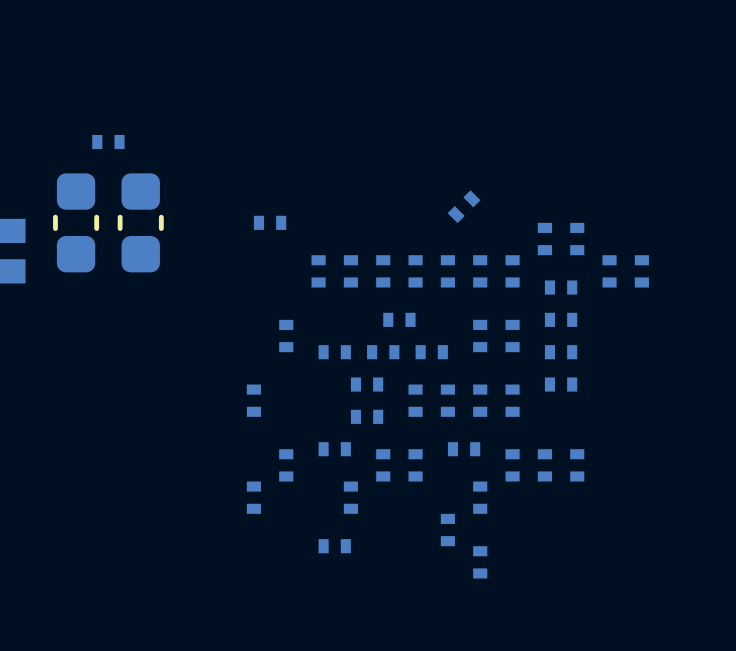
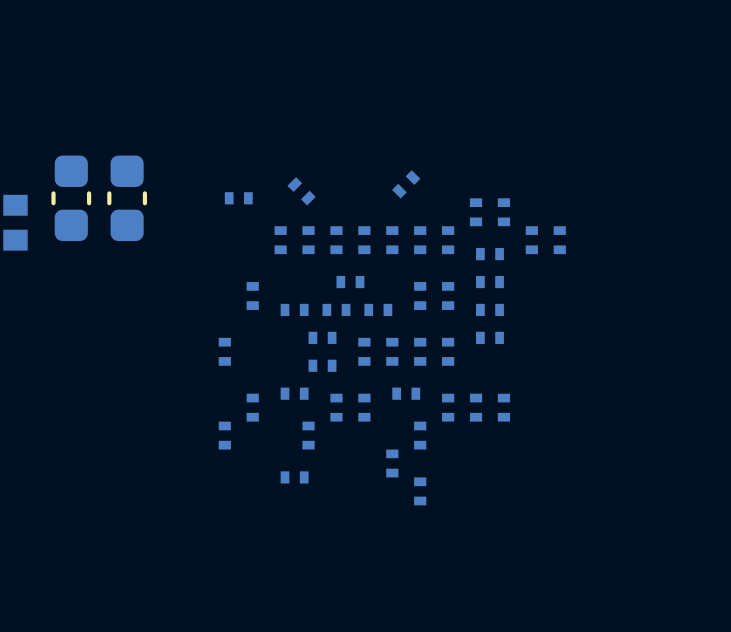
part: (108, 142) -> none
part: none -> (301, 191)

